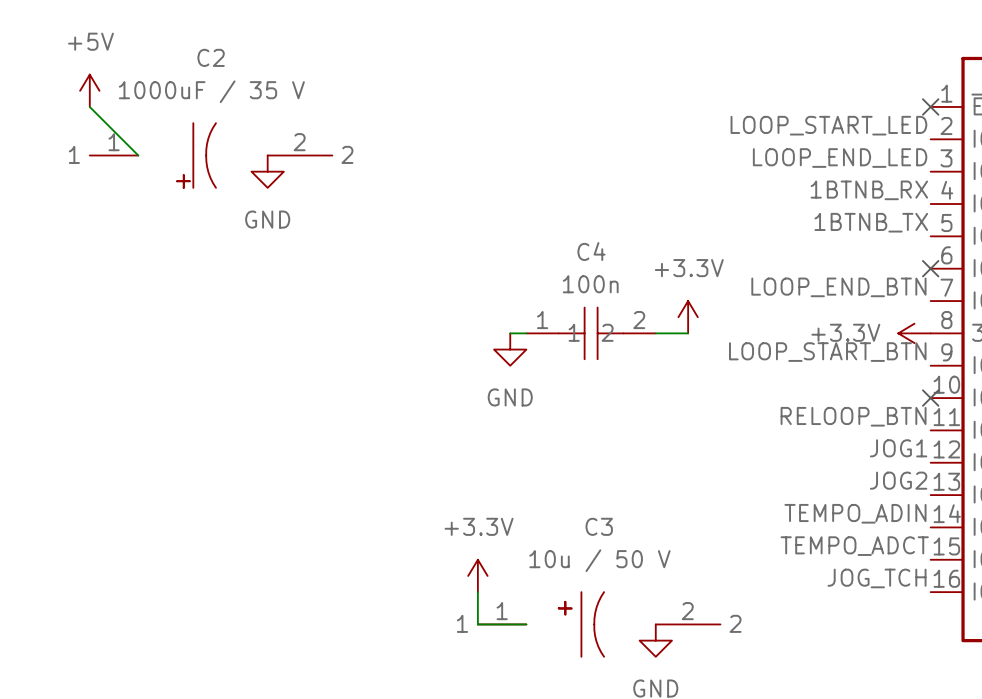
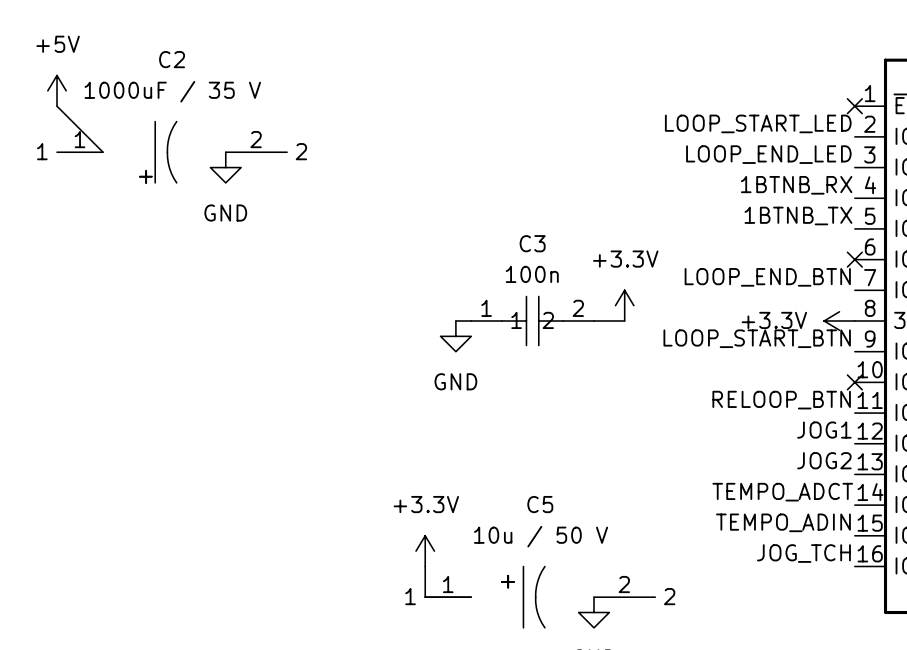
C4 name: C4 (591, 251) -> C3 (532, 243)
label: TEMPO_ADIN (855, 513) -> TEMPO_ADCT (782, 492)
C3 name: C3 (599, 526) -> C5 (540, 504)
label: TEMPO_ADCT (854, 546) -> TEMPO_ADIN (783, 522)

